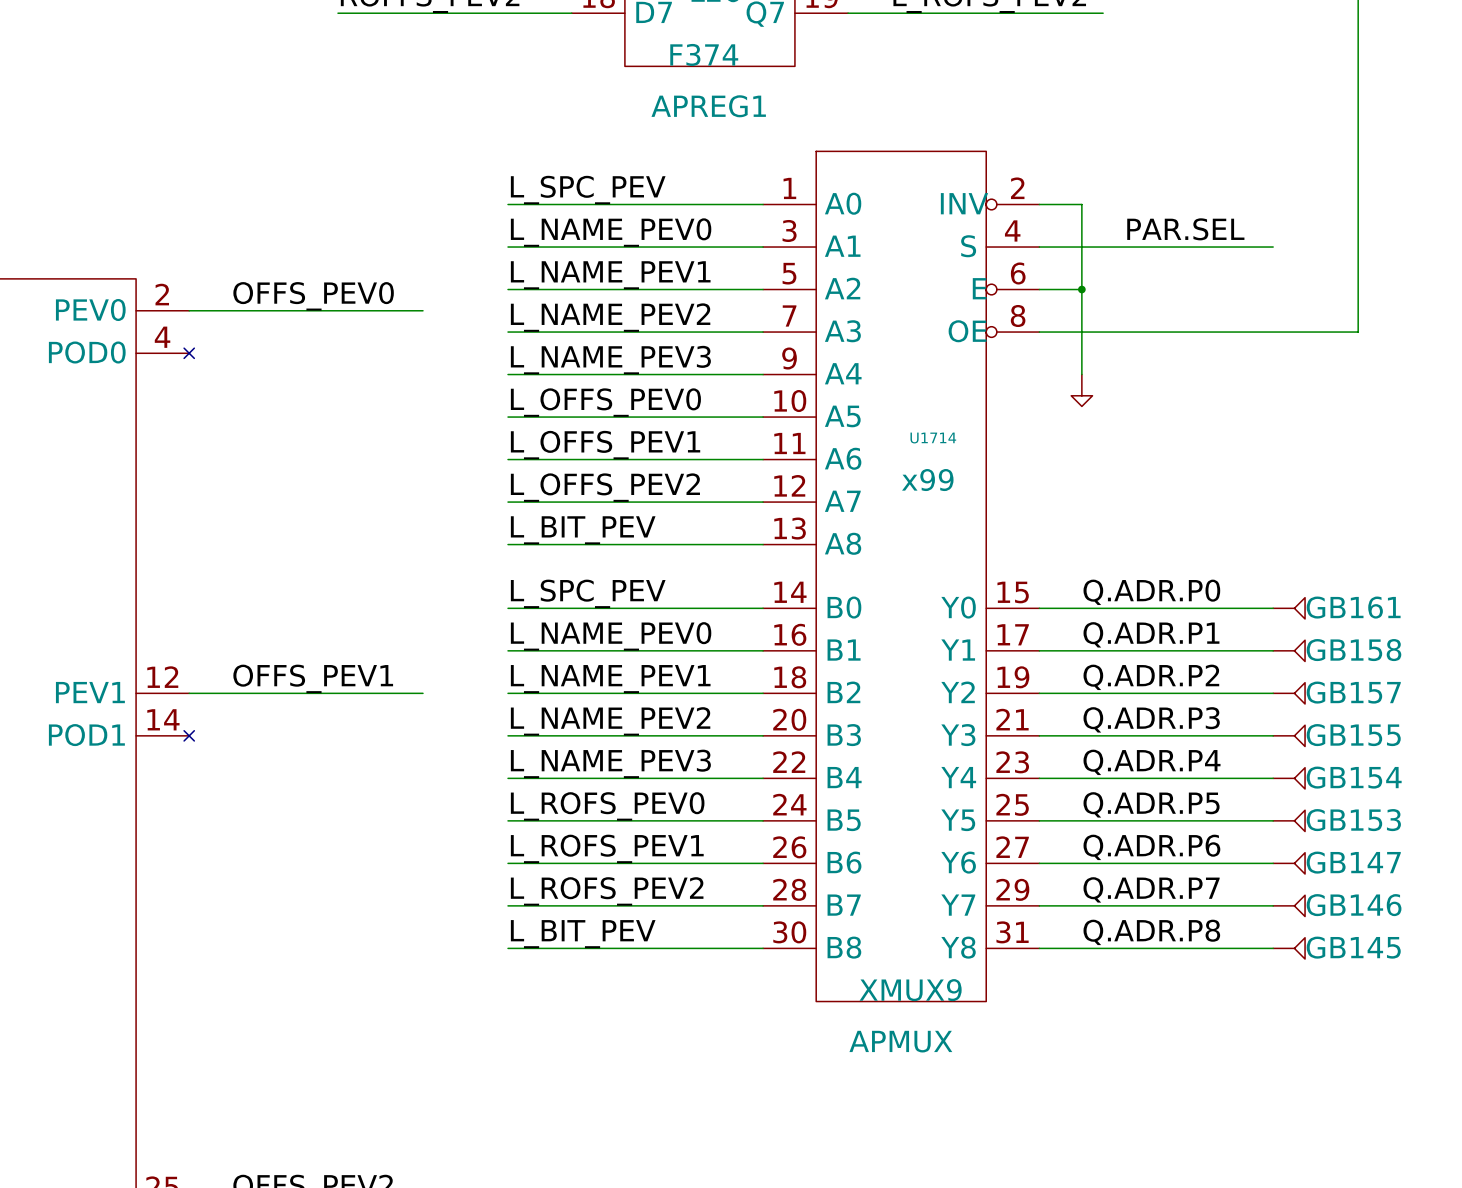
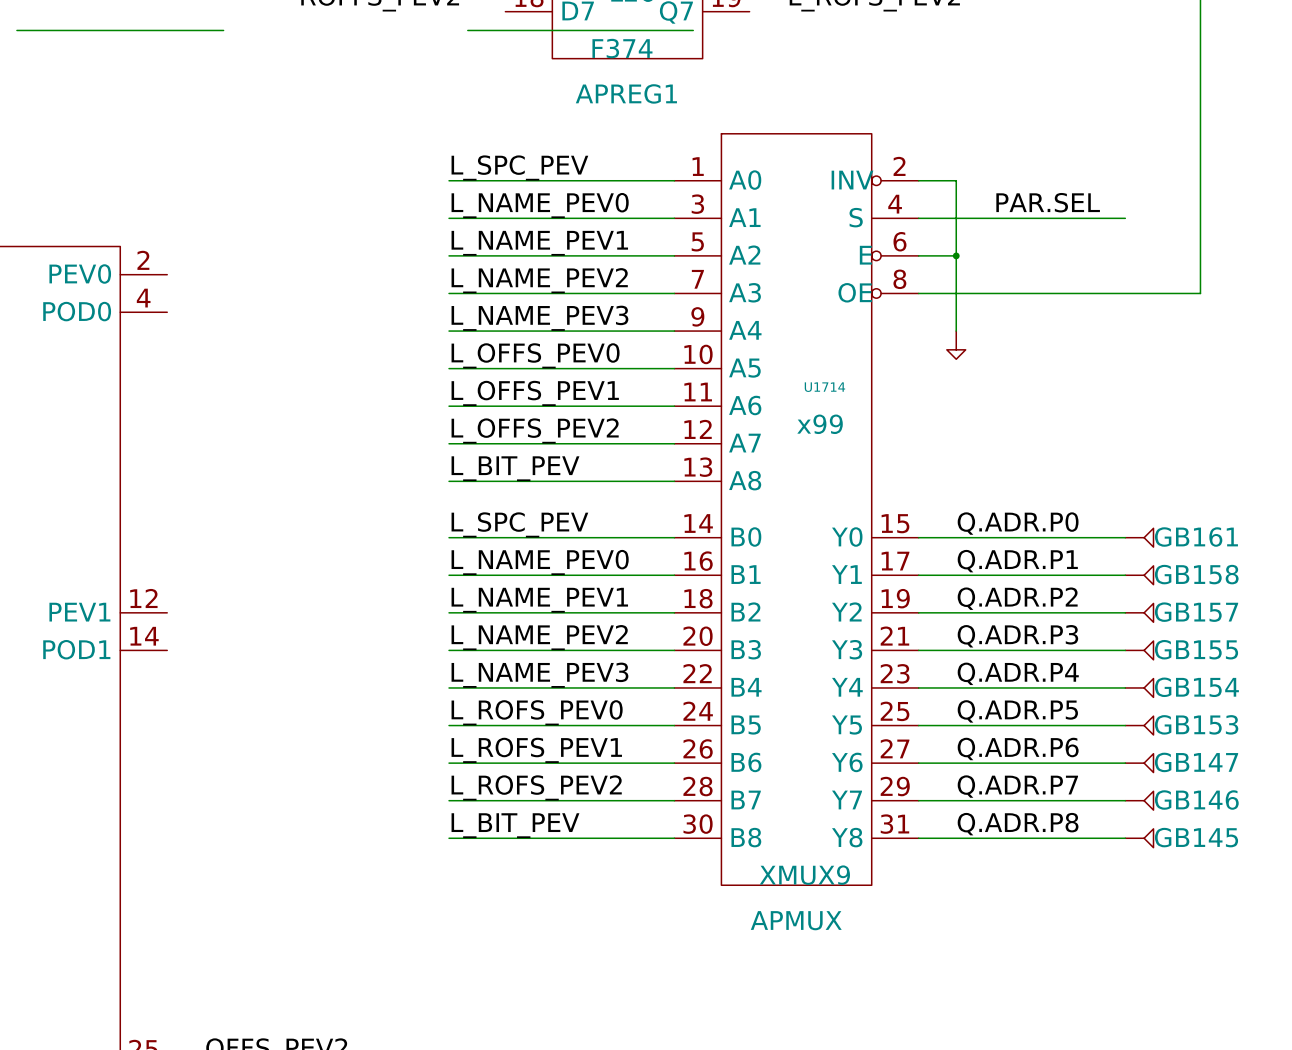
wire: (337, 13) (571, 13) -> none
wire: (848, 13) (1103, 13) -> none
wire: none -> (16, 30) (223, 30)
wire: none -> (467, 30) (693, 30)
label: OFFS_PEV0 (313, 296) -> none
wire: (189, 310) (423, 310) -> none
no-connect mark: (189, 353) -> none
label: OFFS_PEV1 (313, 678) -> none
wire: (189, 693) (423, 693) -> none
no-connect mark: (189, 735) -> none

